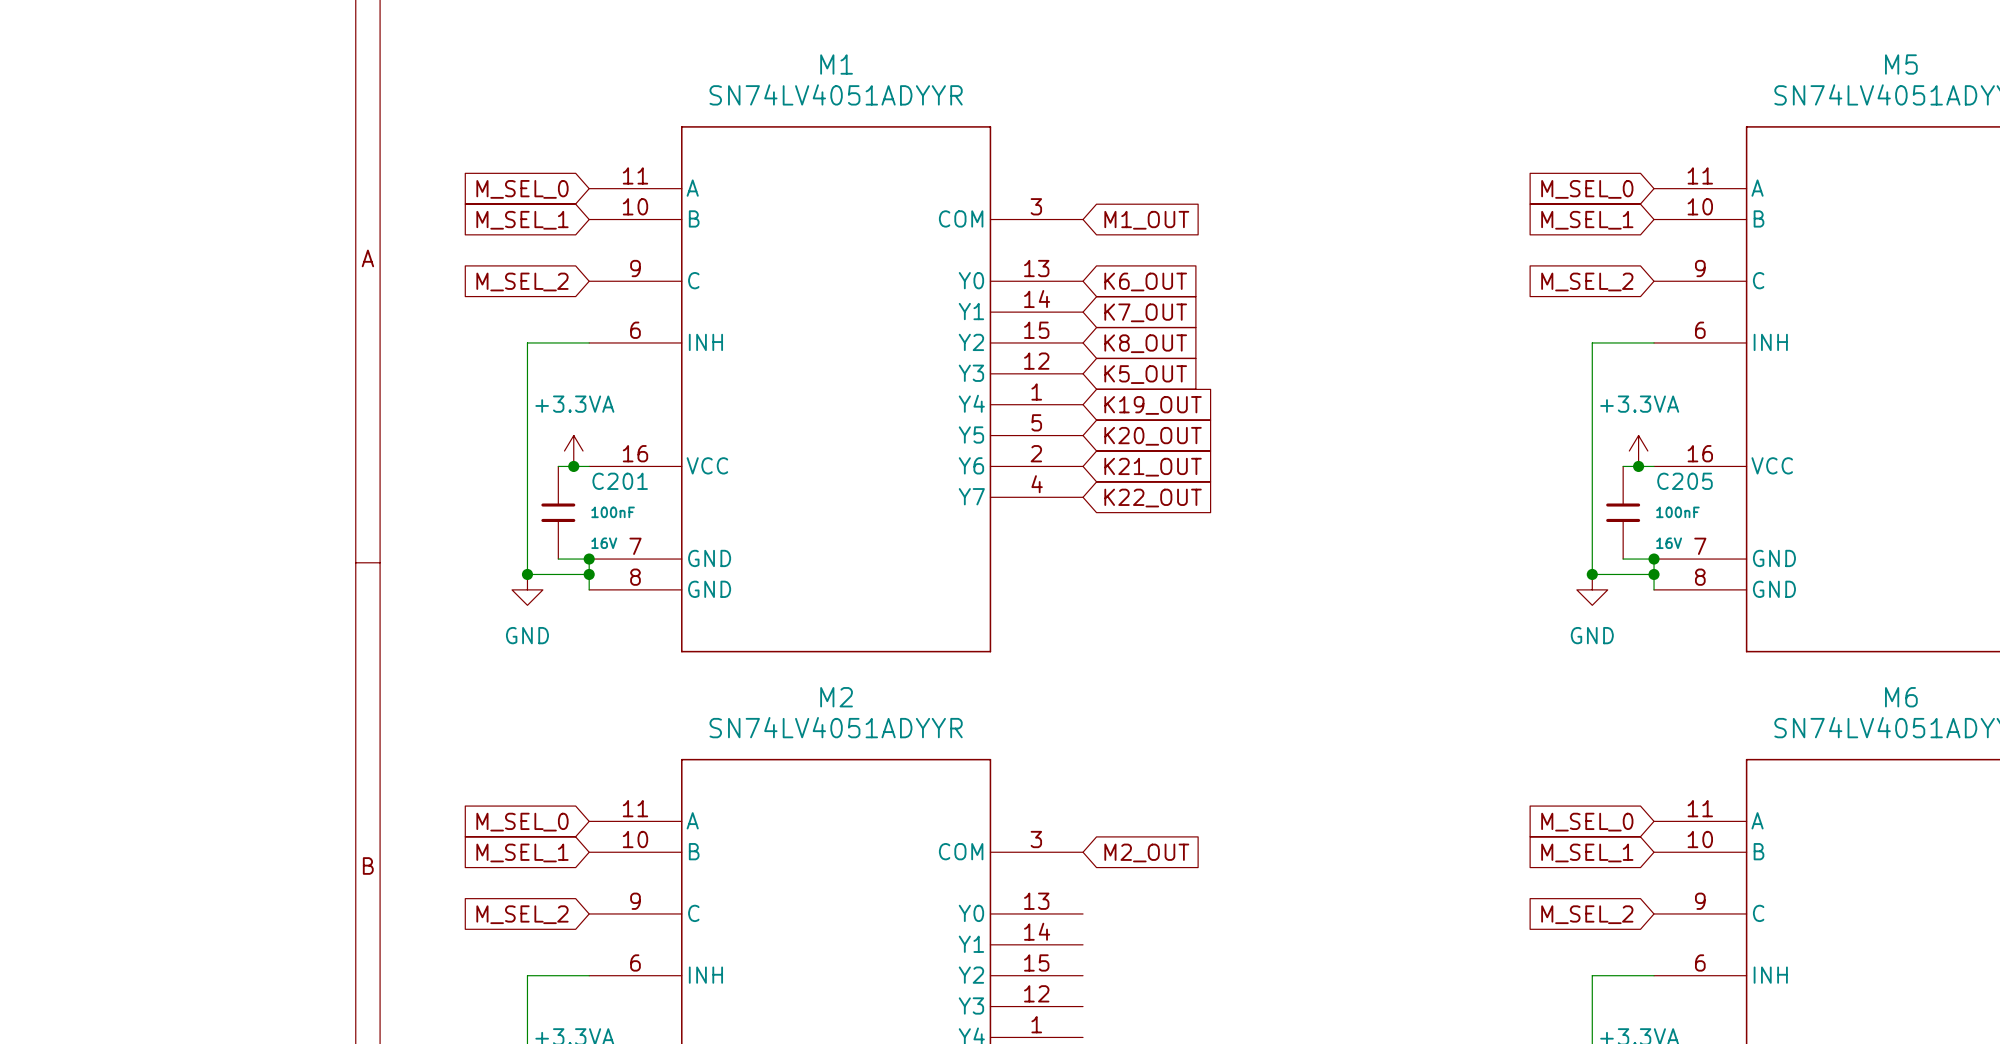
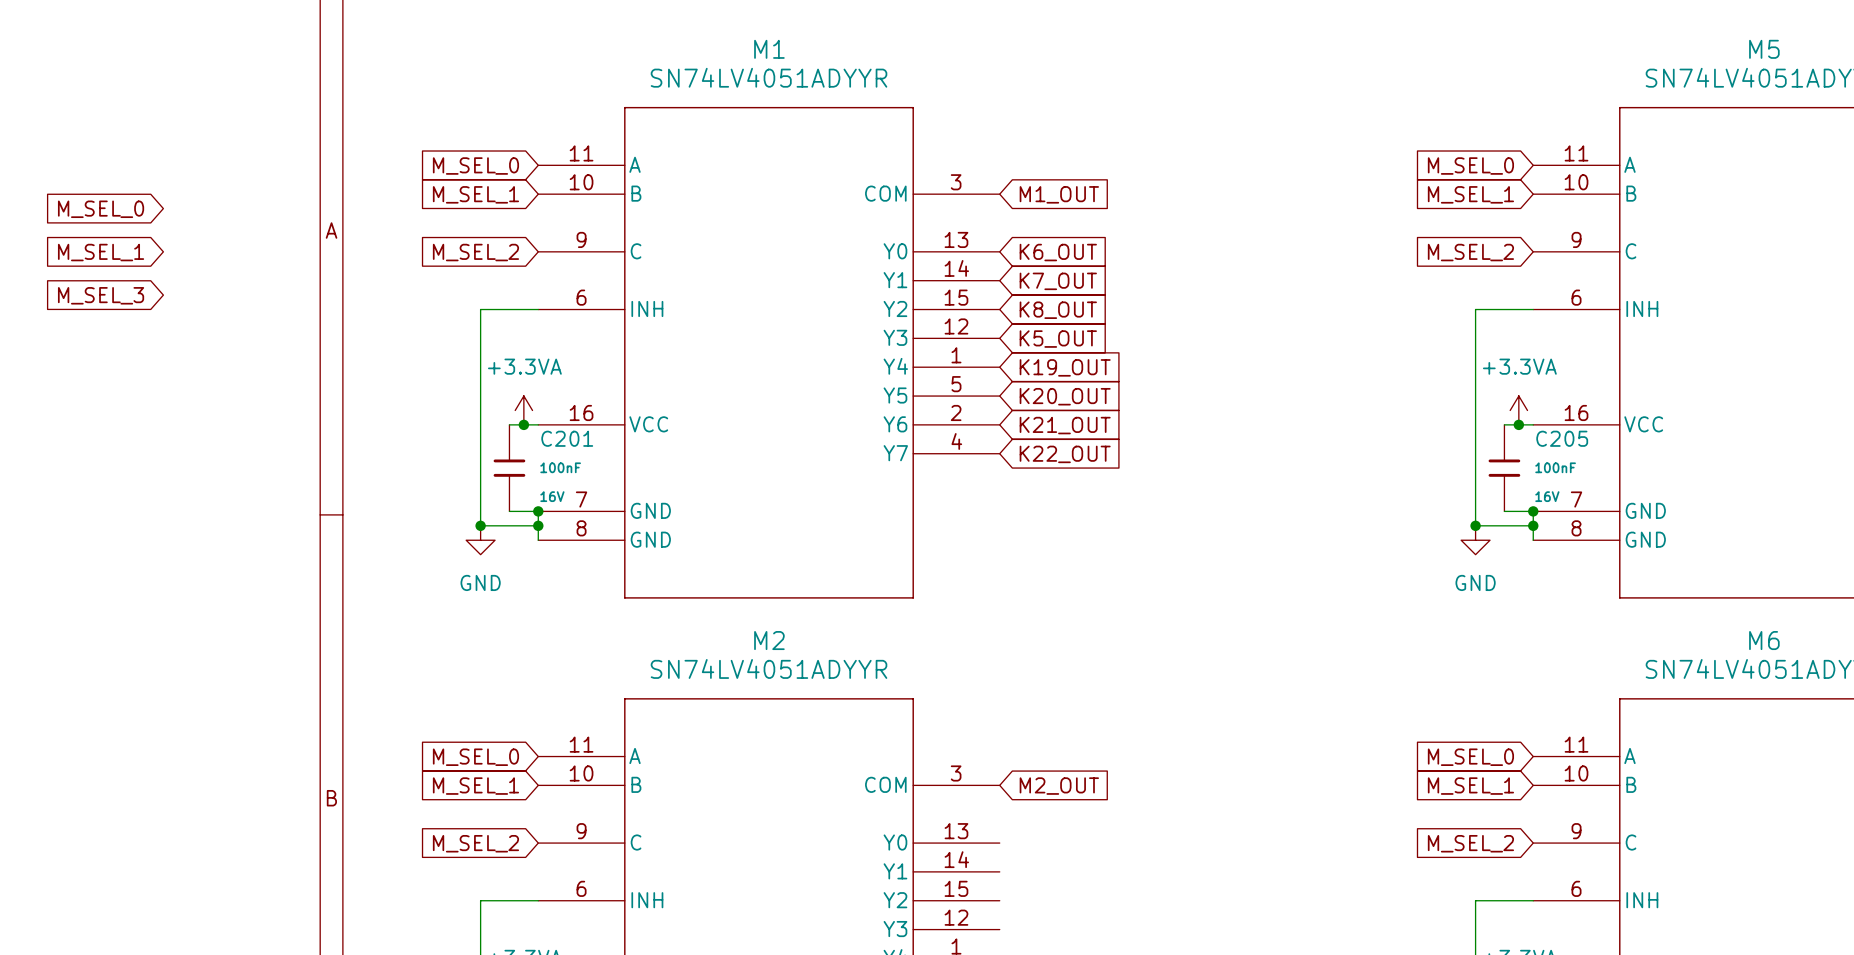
global label: none -> M_SEL_0 (101, 209)
global label: none -> M_SEL_1 (101, 252)
global label: none -> M_SEL_3 (101, 295)

